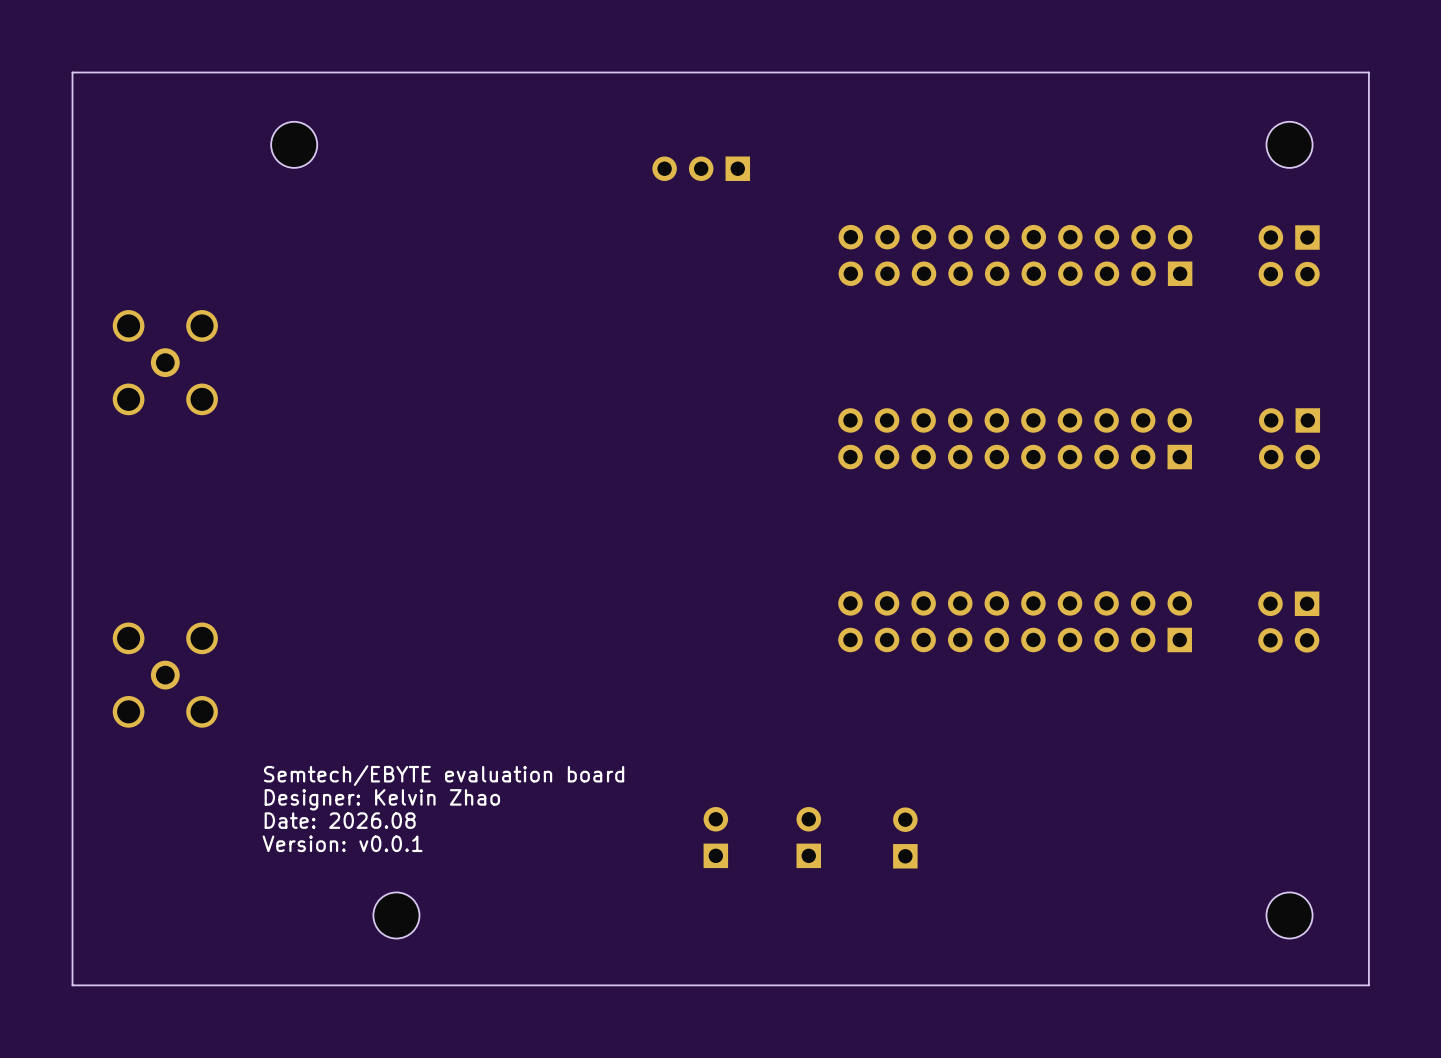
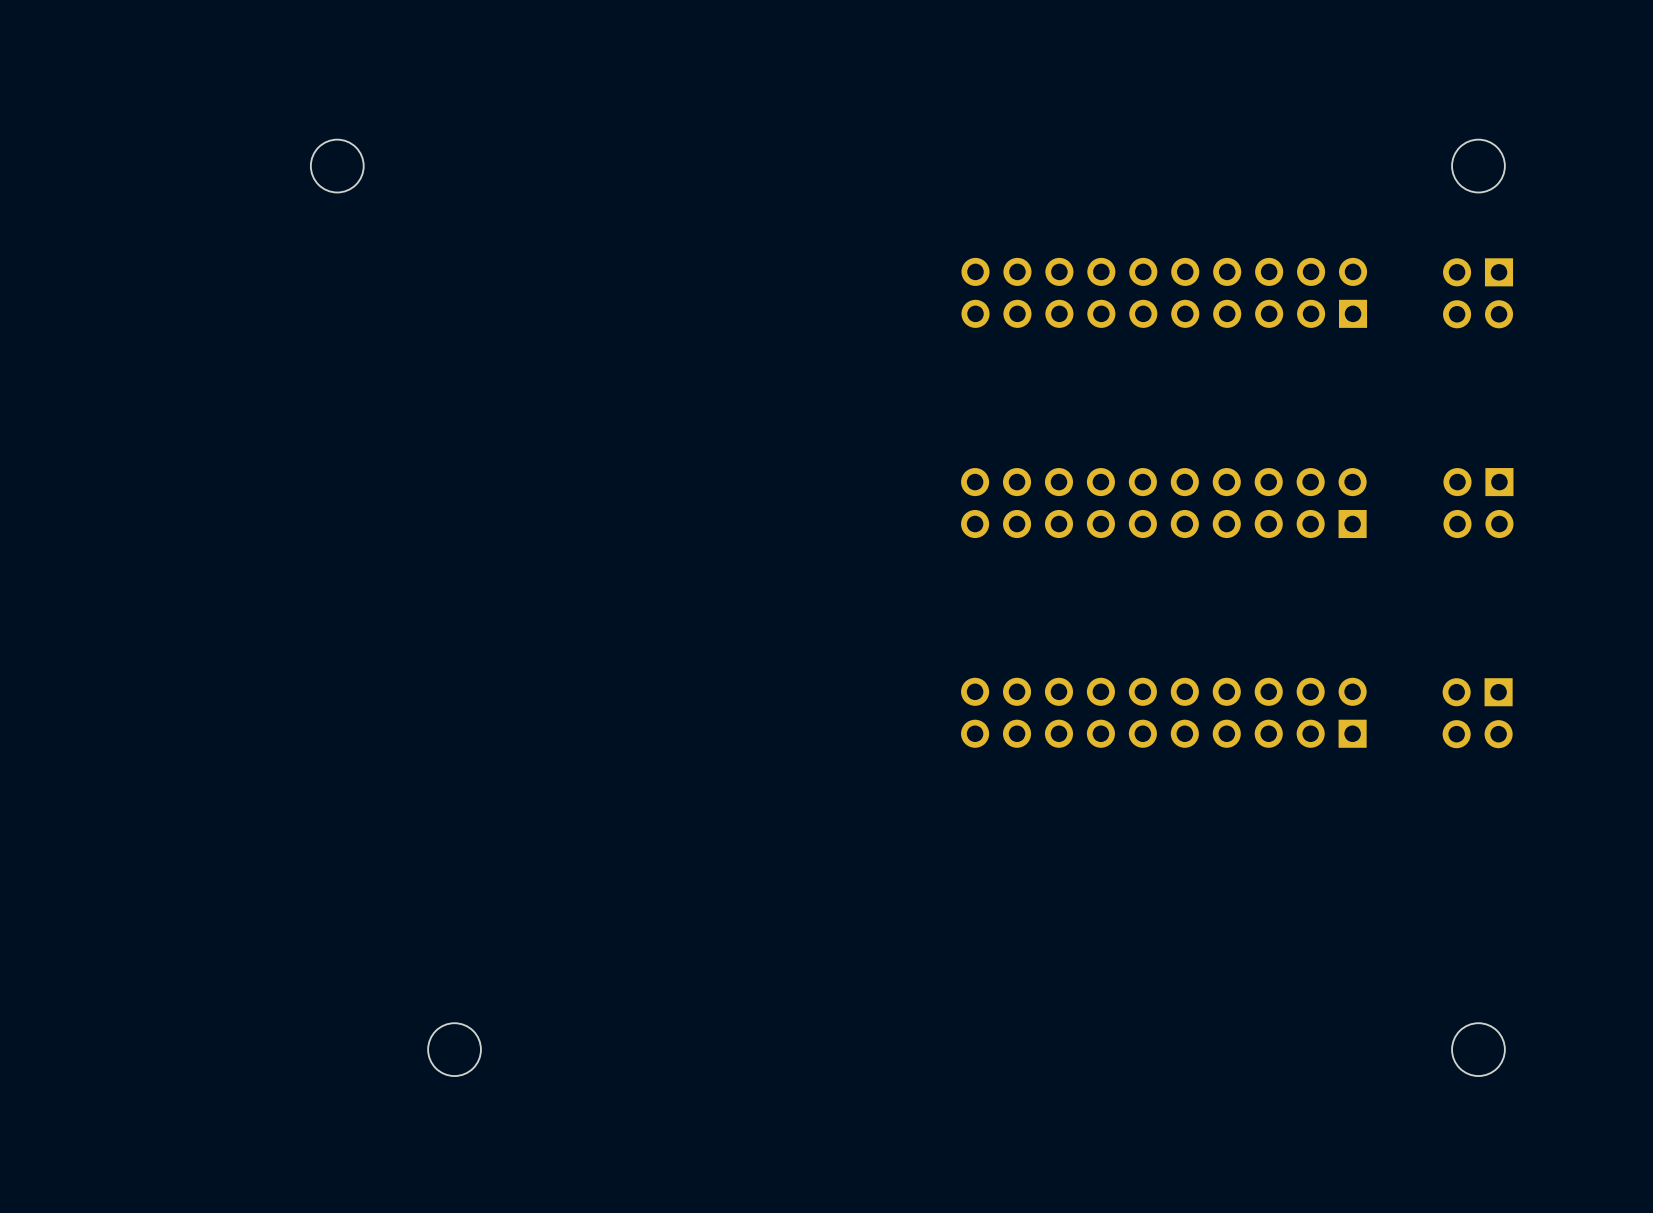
board edge: (1368, 72) (72, 72) (72, 985) (1368, 985) (1368, 72) -> none
part: (701, 168) -> none
part: (165, 362) -> none
part: (165, 675) -> none
text: Semtech/EBYTE evaluation board (444, 775) -> none
text: Designer: Kelvin Zhao (382, 799) -> none
text: Date: 2026.08 (340, 820) -> none
part: (715, 837) -> none
part: (808, 837) -> none
part: (905, 837) -> none
text: Version: v0.0.1 (342, 843) -> none

